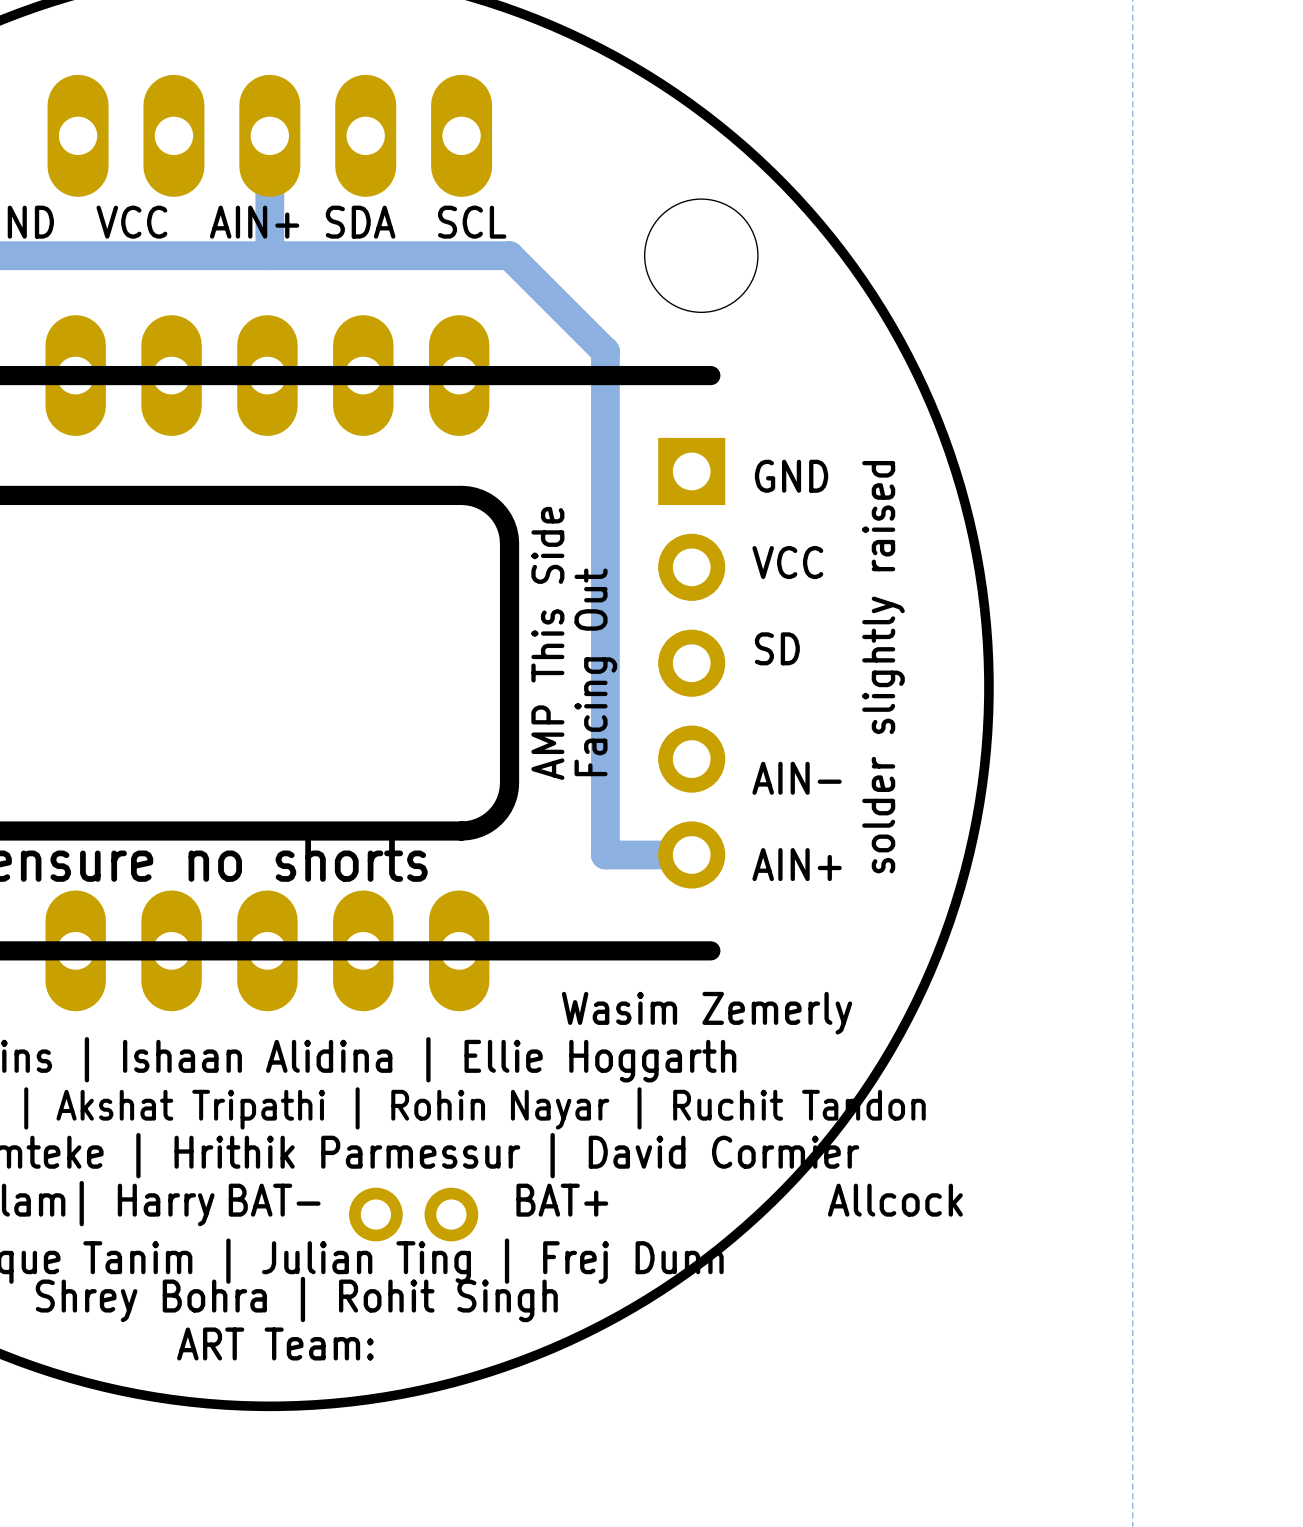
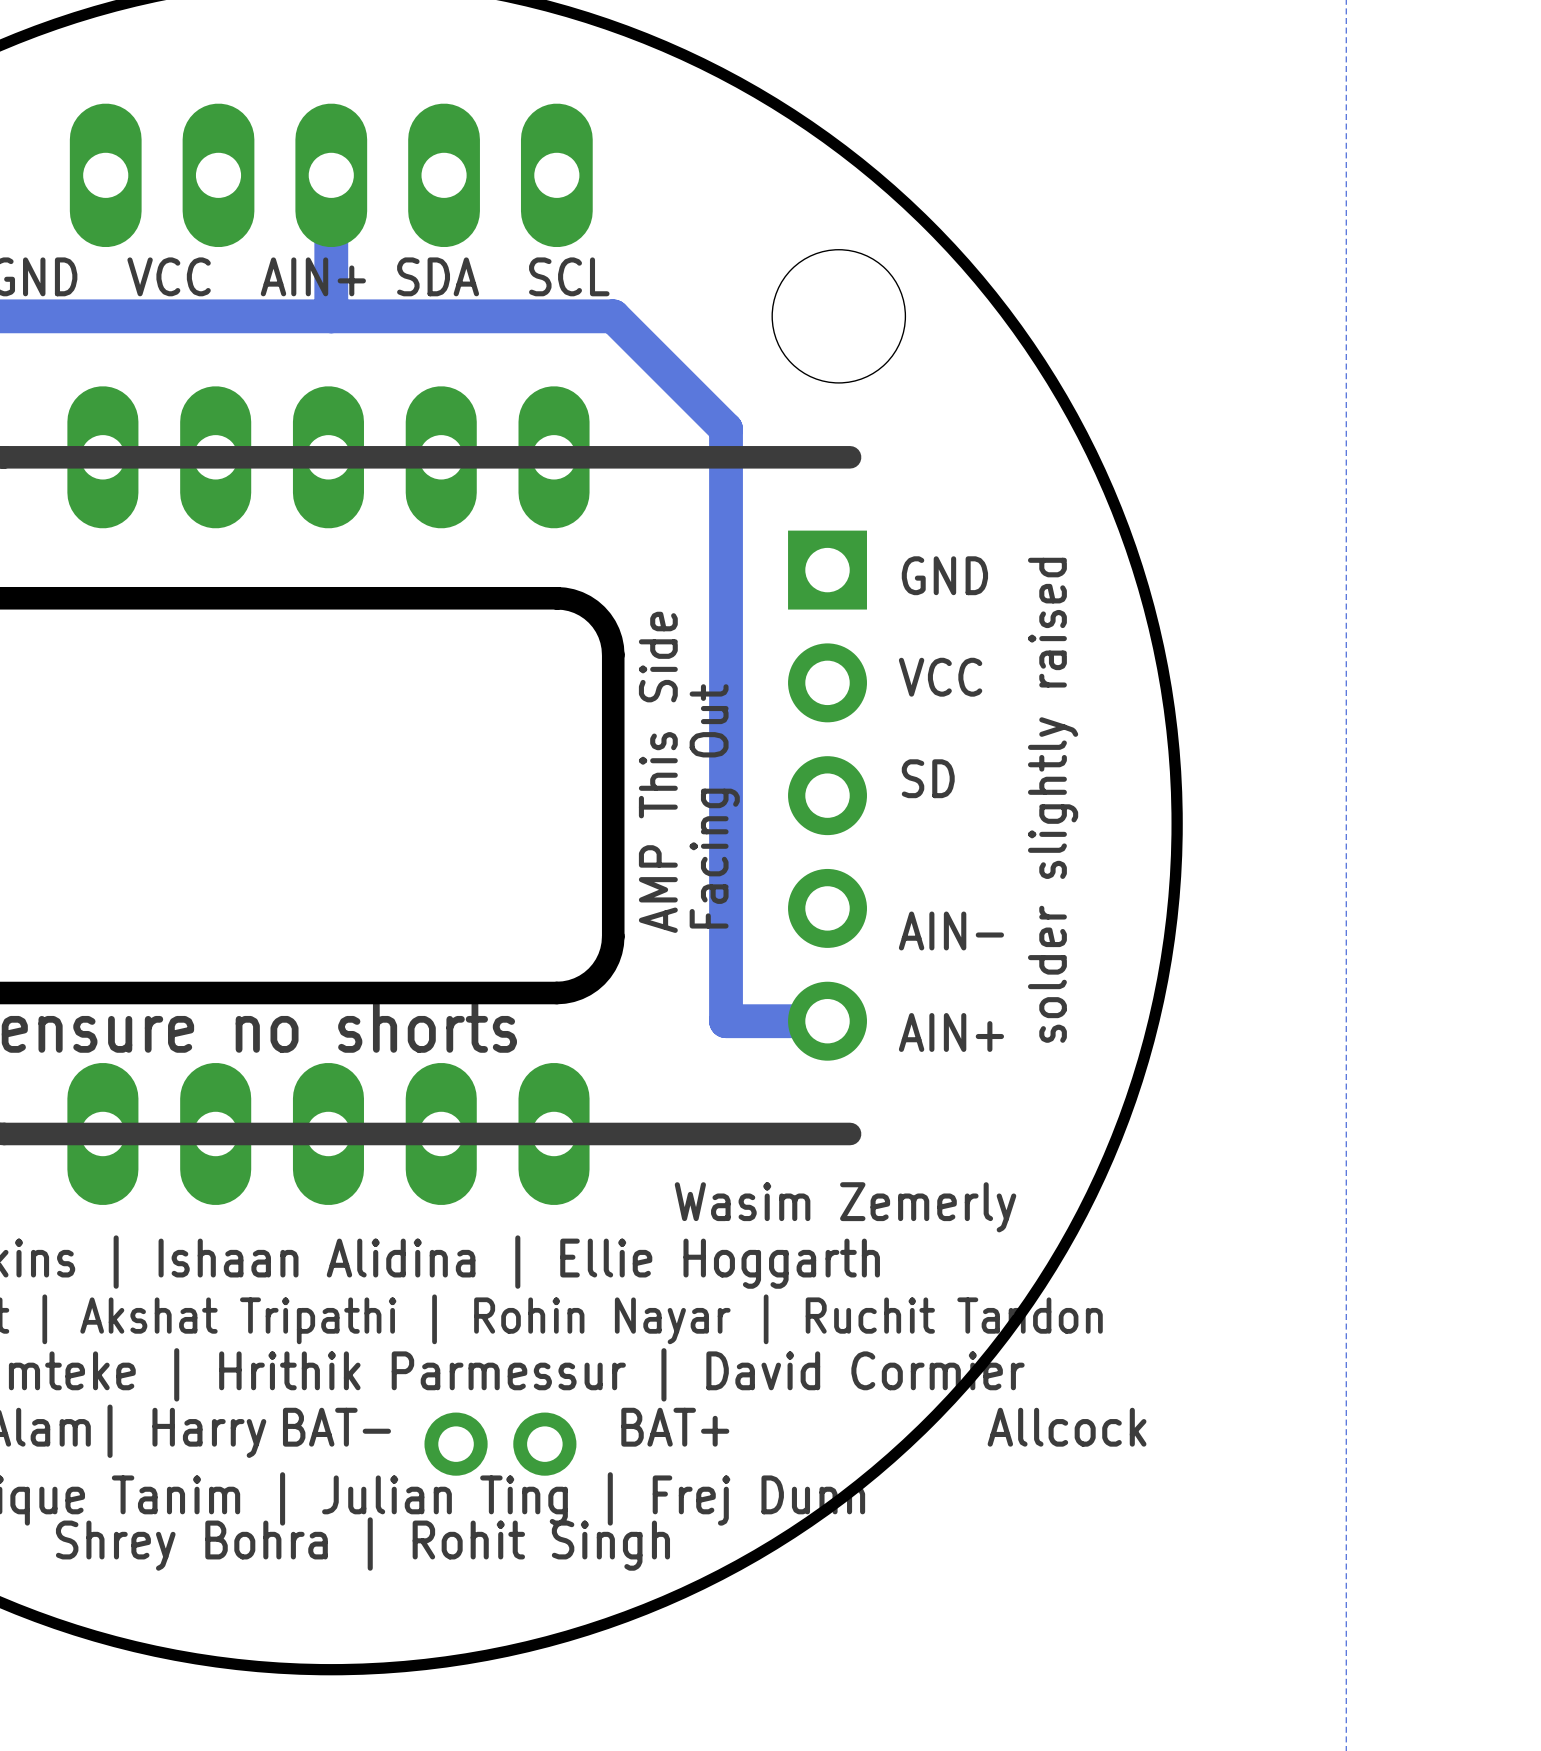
text: ART Team: (275, 1343) -> none

